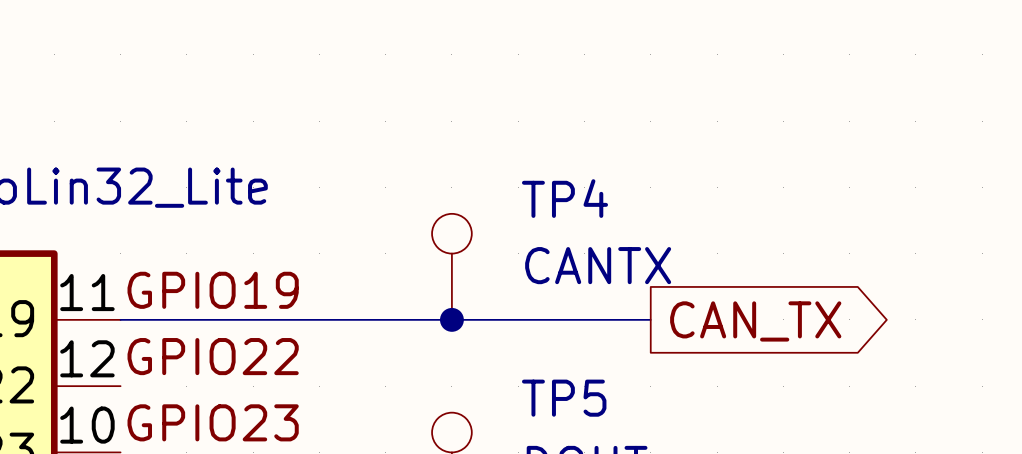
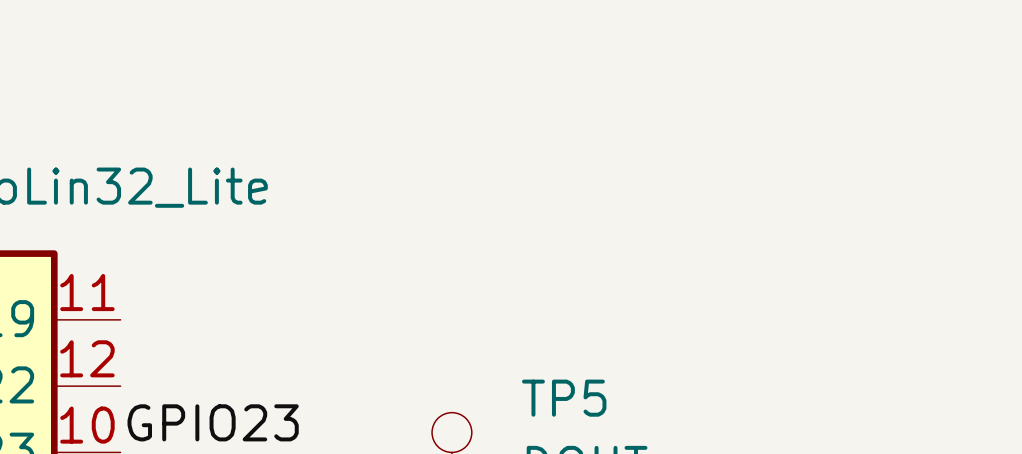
TP4: CANTX (451, 266) -> none
label: GPIO19 (213, 290) -> none
wire: (120, 319) (650, 319) -> none
junction: (451, 319) -> none
global label: CAN_TX (755, 321) -> none
label: GPIO22 (213, 356) -> none

